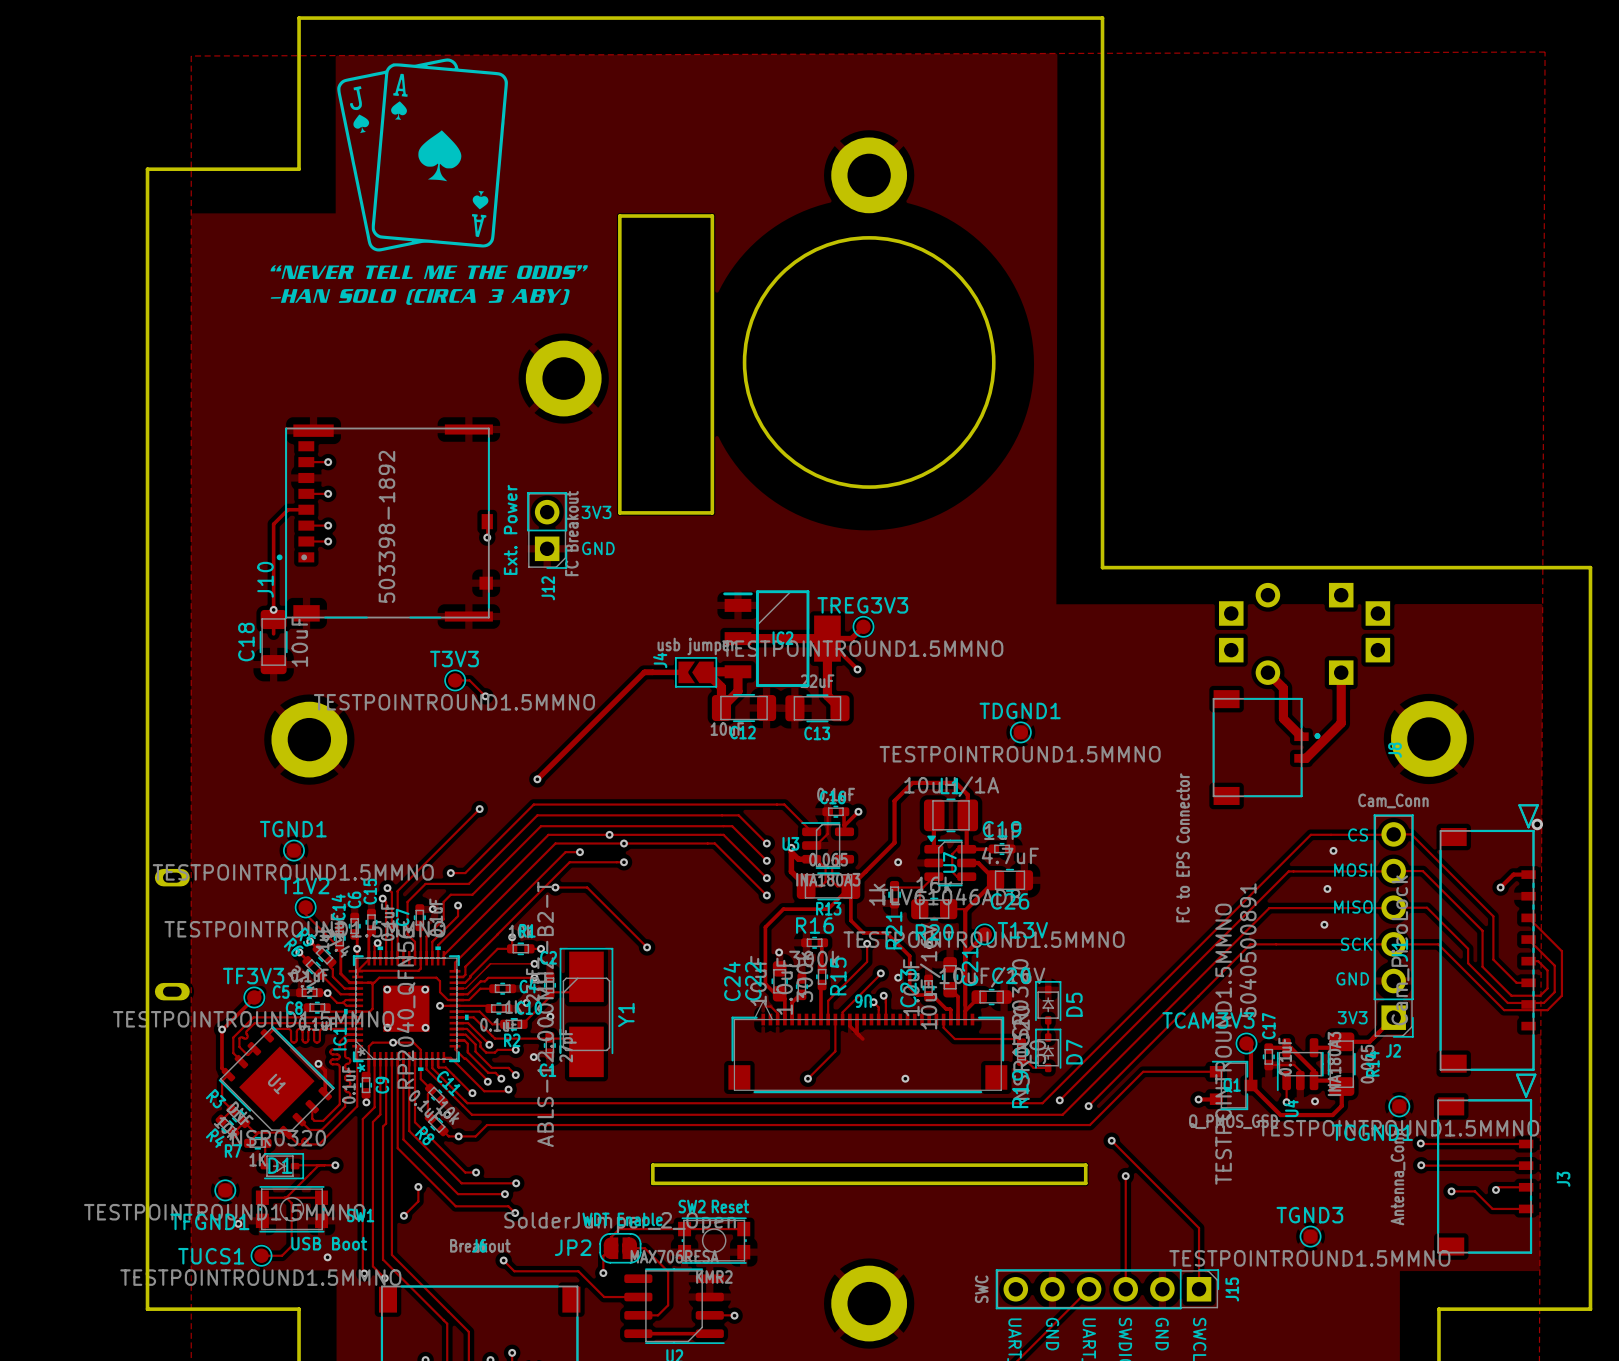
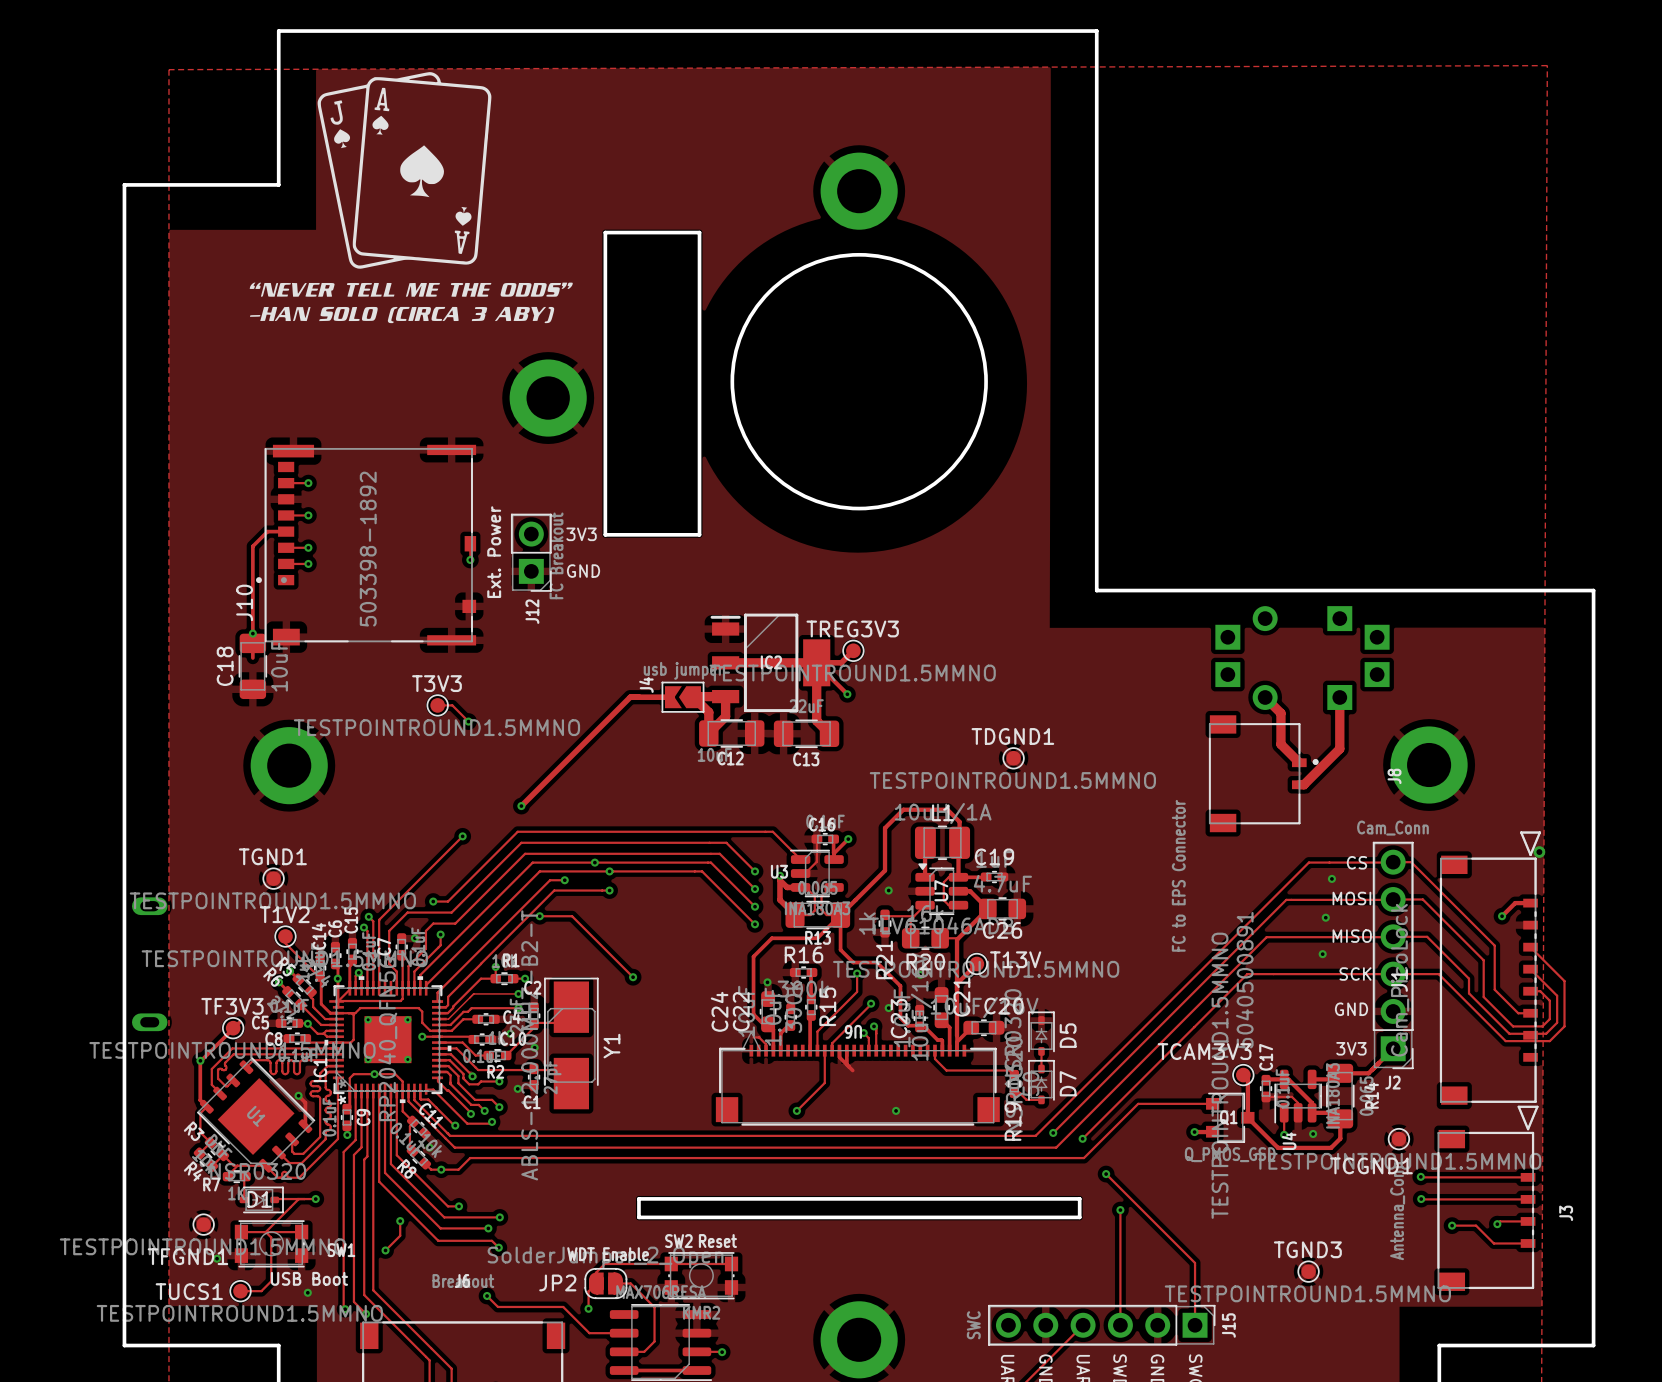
IC1 footprint: [344, 946, 469, 1072] -> [324, 976, 452, 1104]
via: (387, 989) -> none
via: (425, 989) -> none
via: (387, 1027) -> none
via: (425, 1027) -> none

